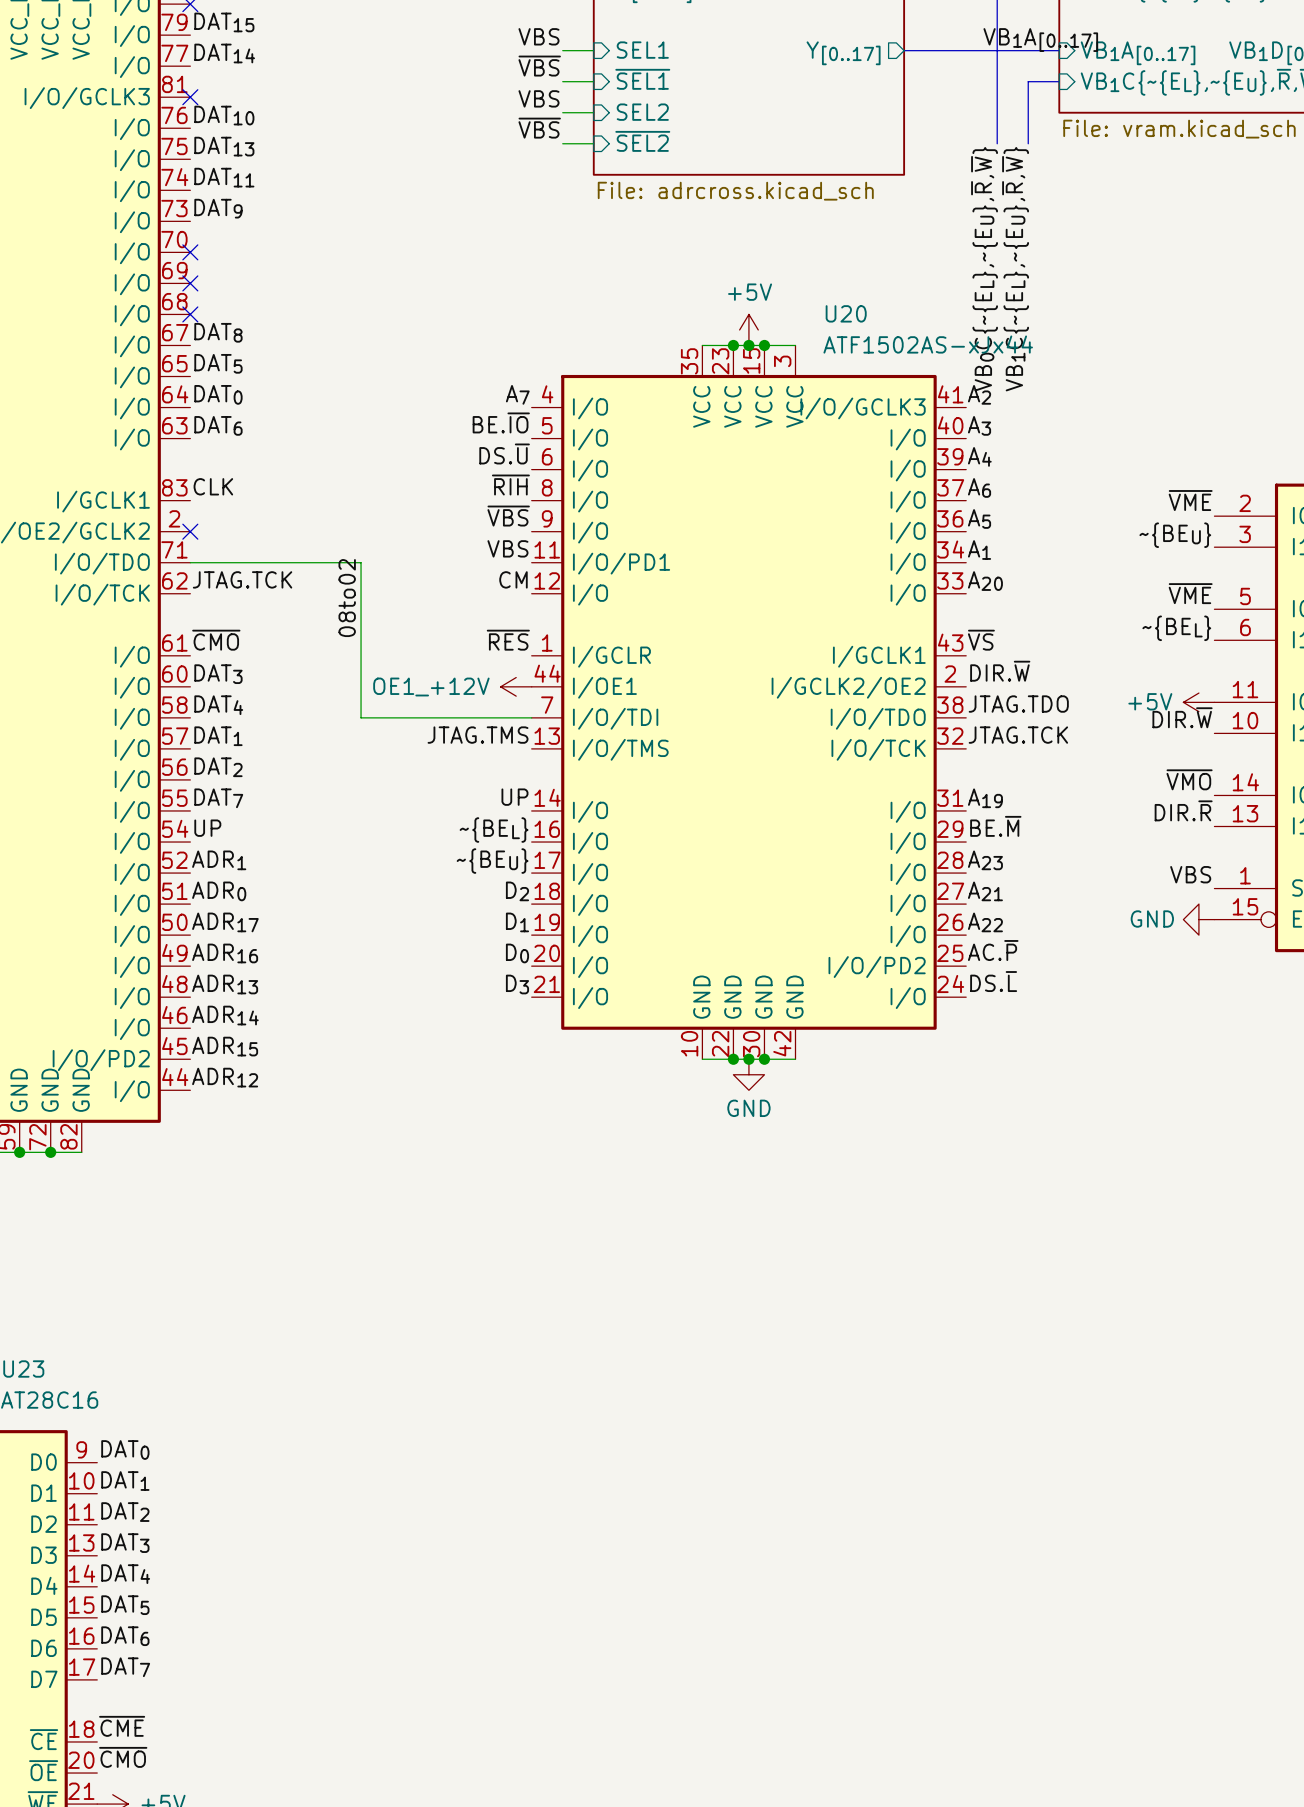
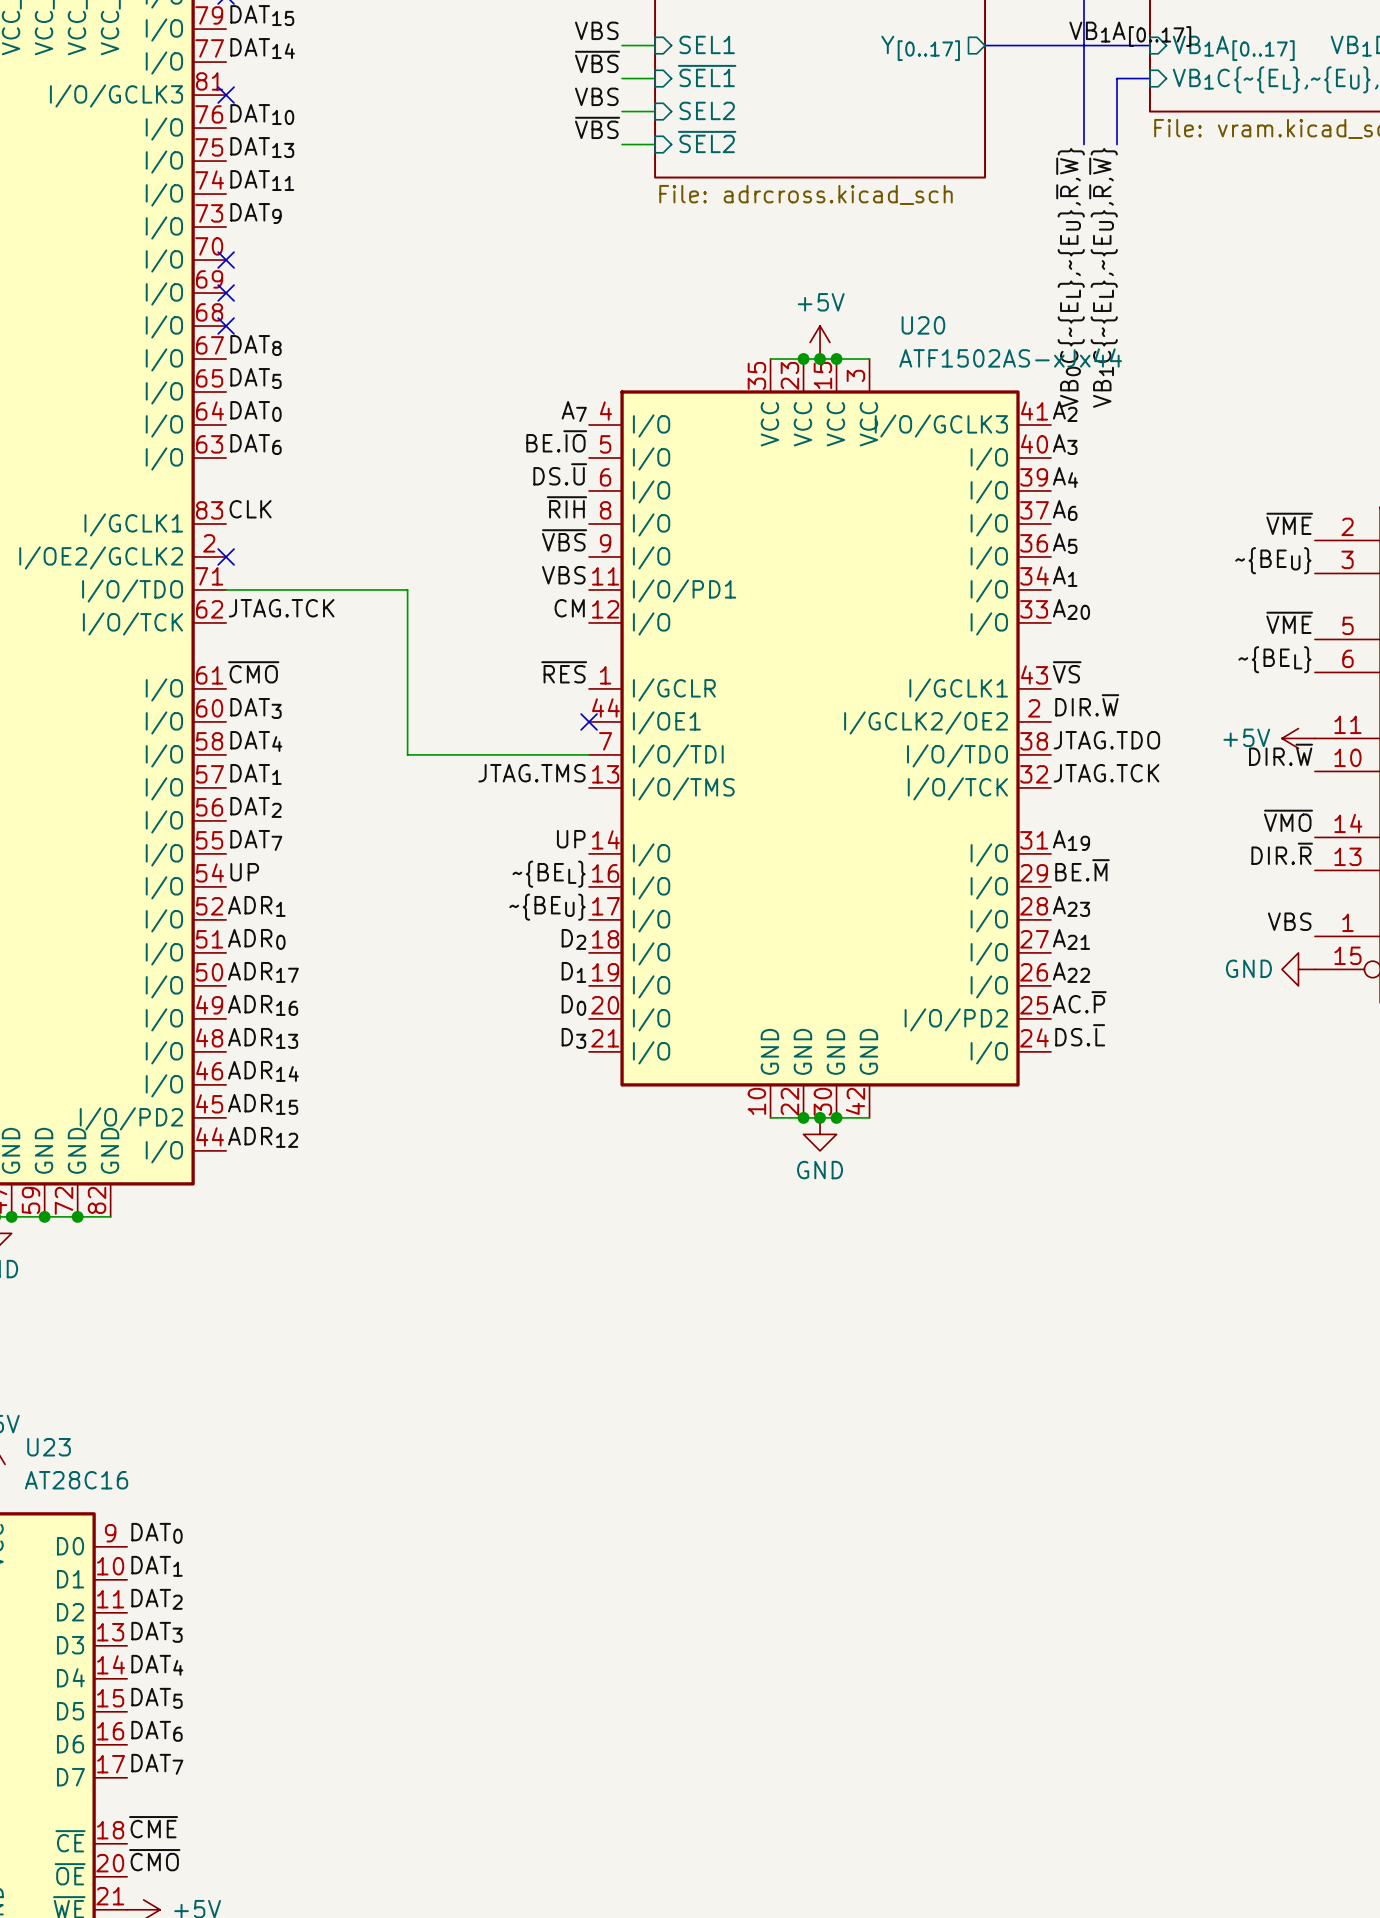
label: 08to02 (347, 598) -> none
power symbol: OE1_+12V (516, 686) -> none
no-connect mark: none -> (589, 721)

